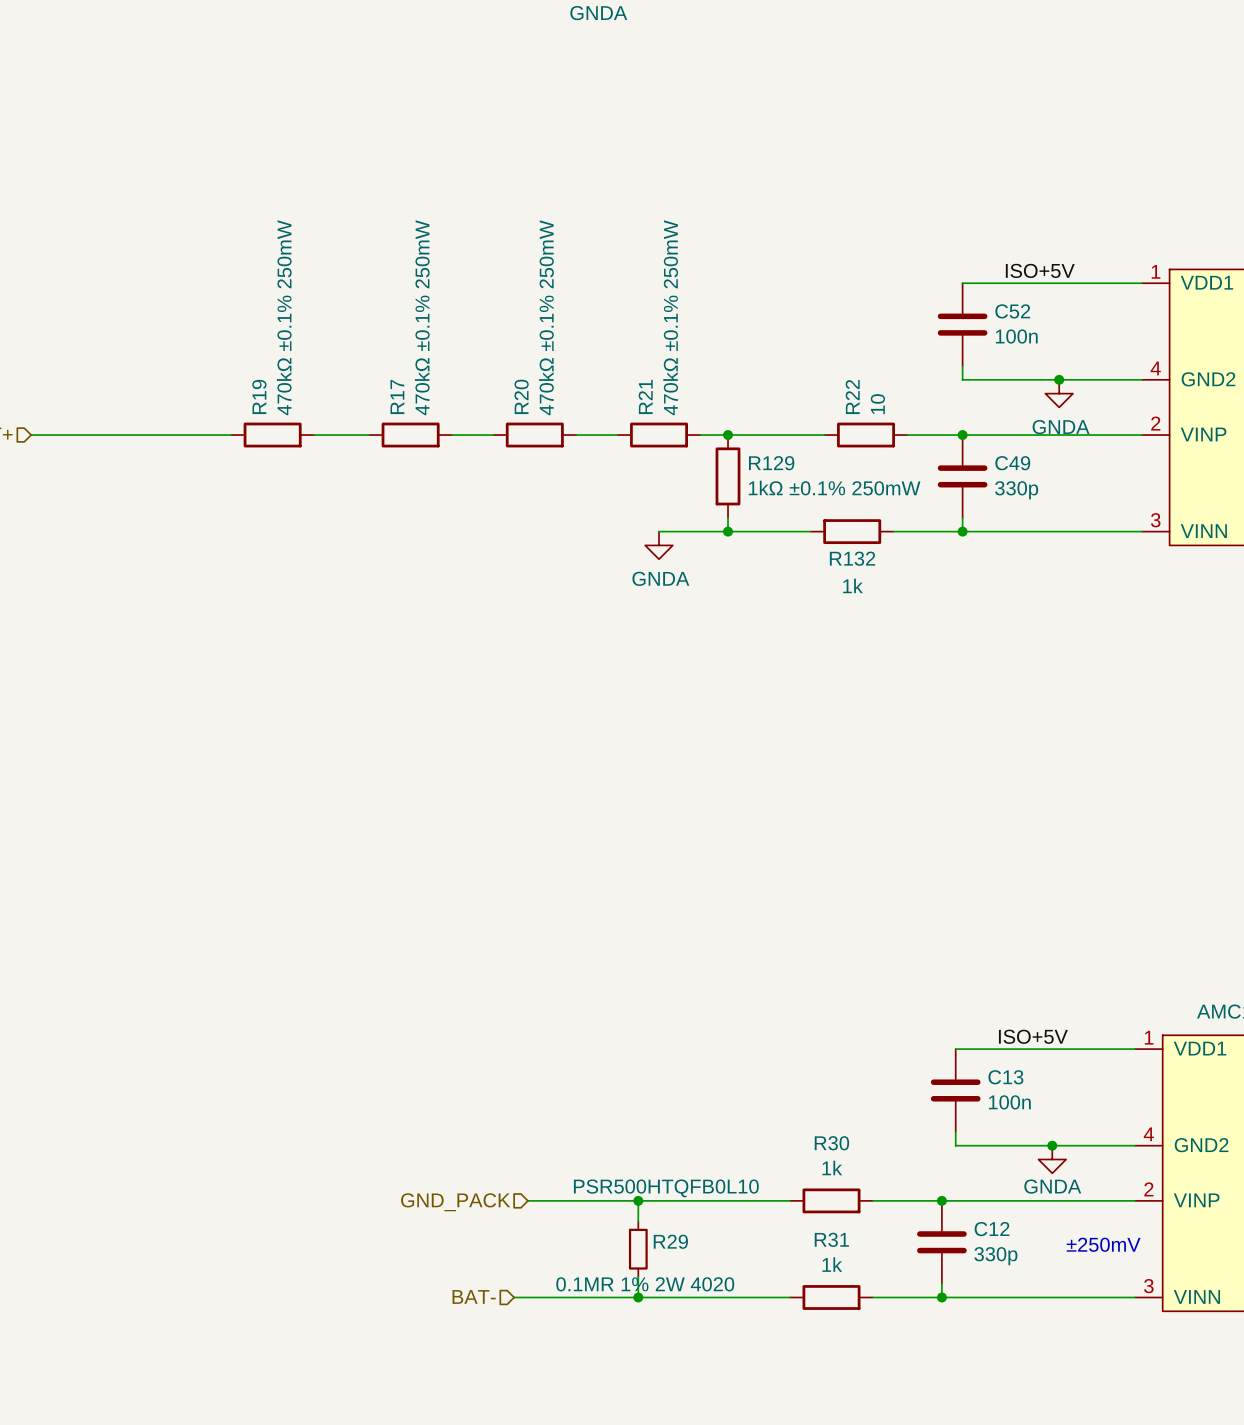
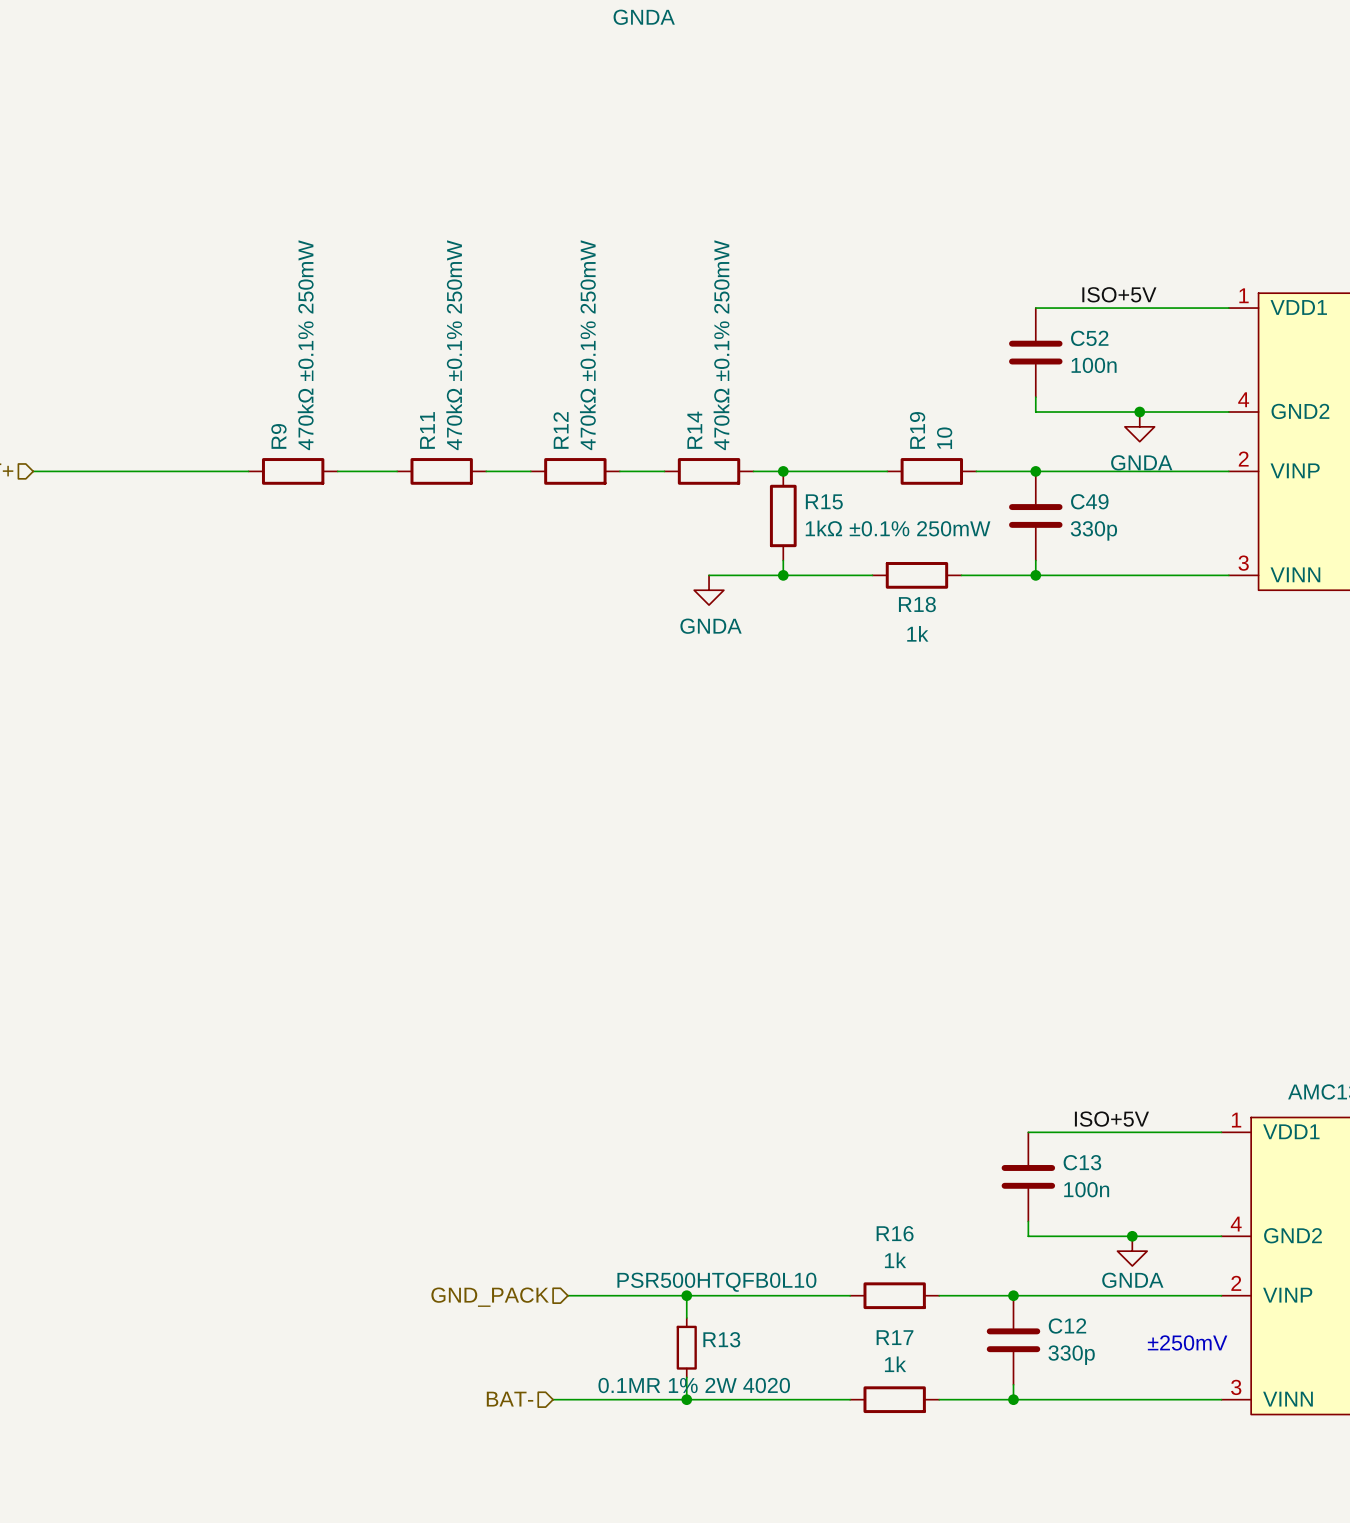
R19 name: R19 (259, 396) -> R9 (278, 436)
R17 name: R17 (397, 396) -> R11 (427, 430)
R20 name: R20 (521, 396) -> R12 (561, 430)
R21 name: R21 (645, 396) -> R14 (694, 430)
R22 name: R22 (852, 396) -> R19 (917, 430)
R129 name: R129 (771, 463) -> R15 (824, 501)
R132 name: R132 (852, 558) -> R18 (917, 604)
R30 name: R30 (831, 1143) -> R16 (895, 1233)
R31 name: R31 (831, 1239) -> R17 (895, 1337)
R29 name: R29 (670, 1241) -> R13 (721, 1339)

